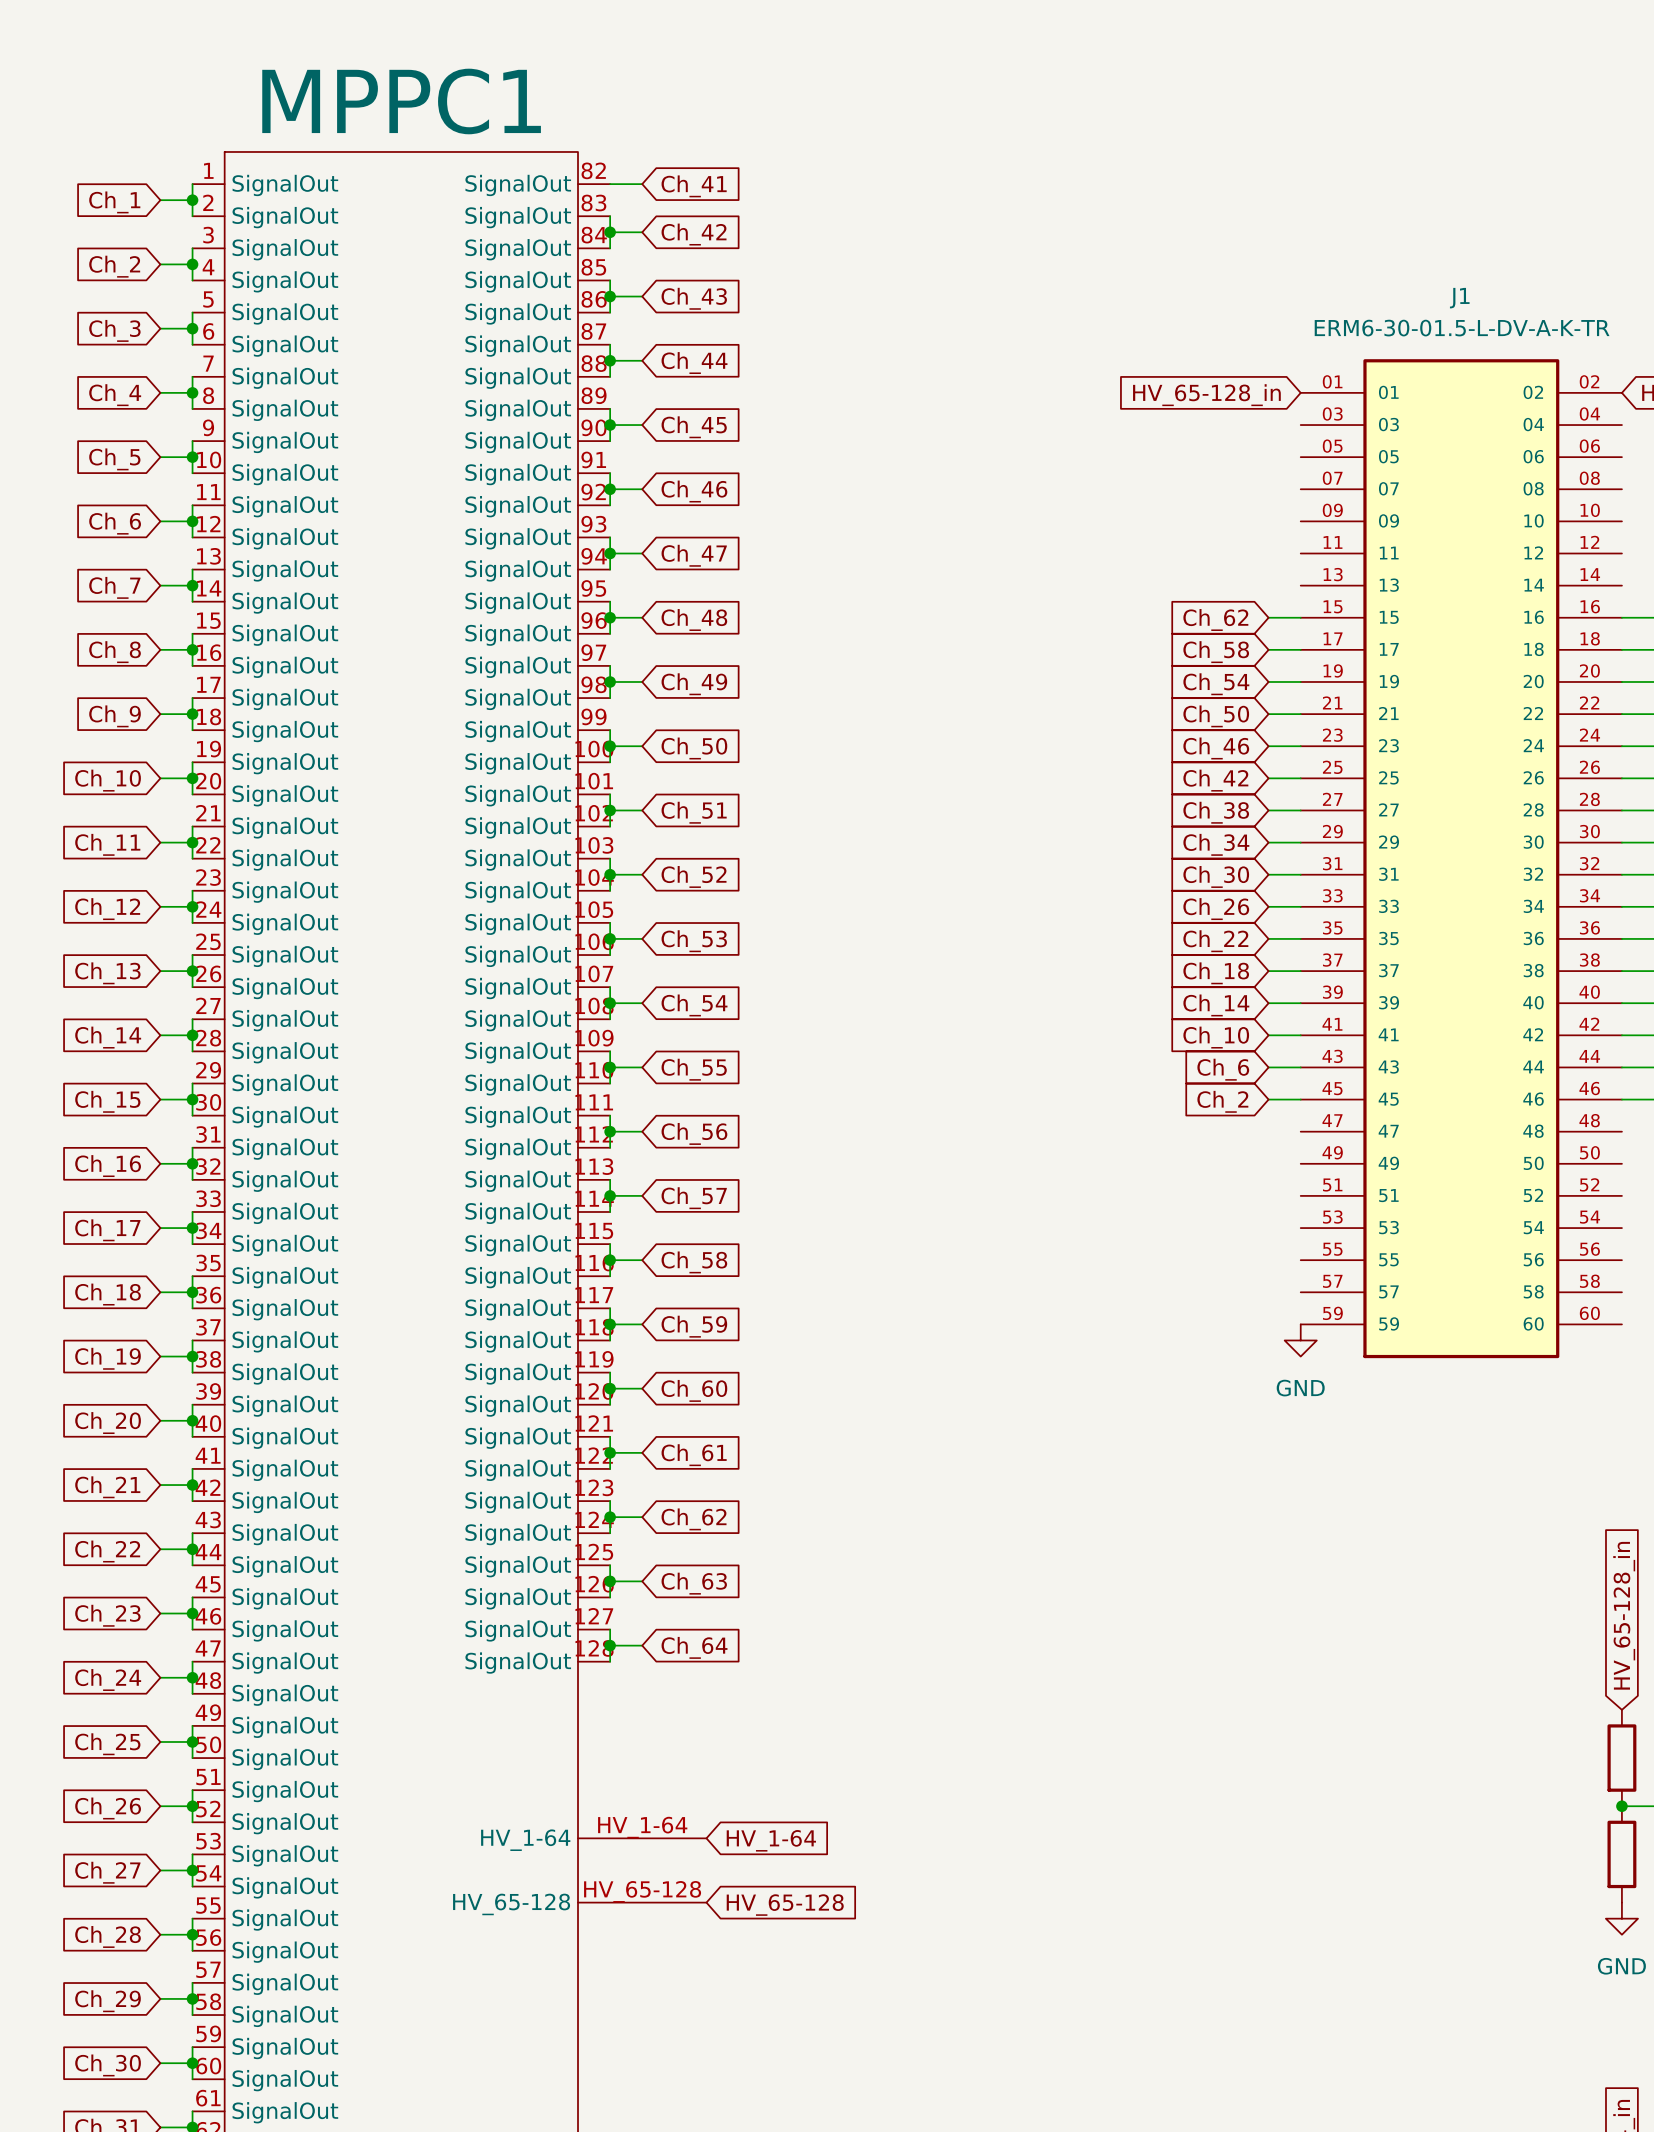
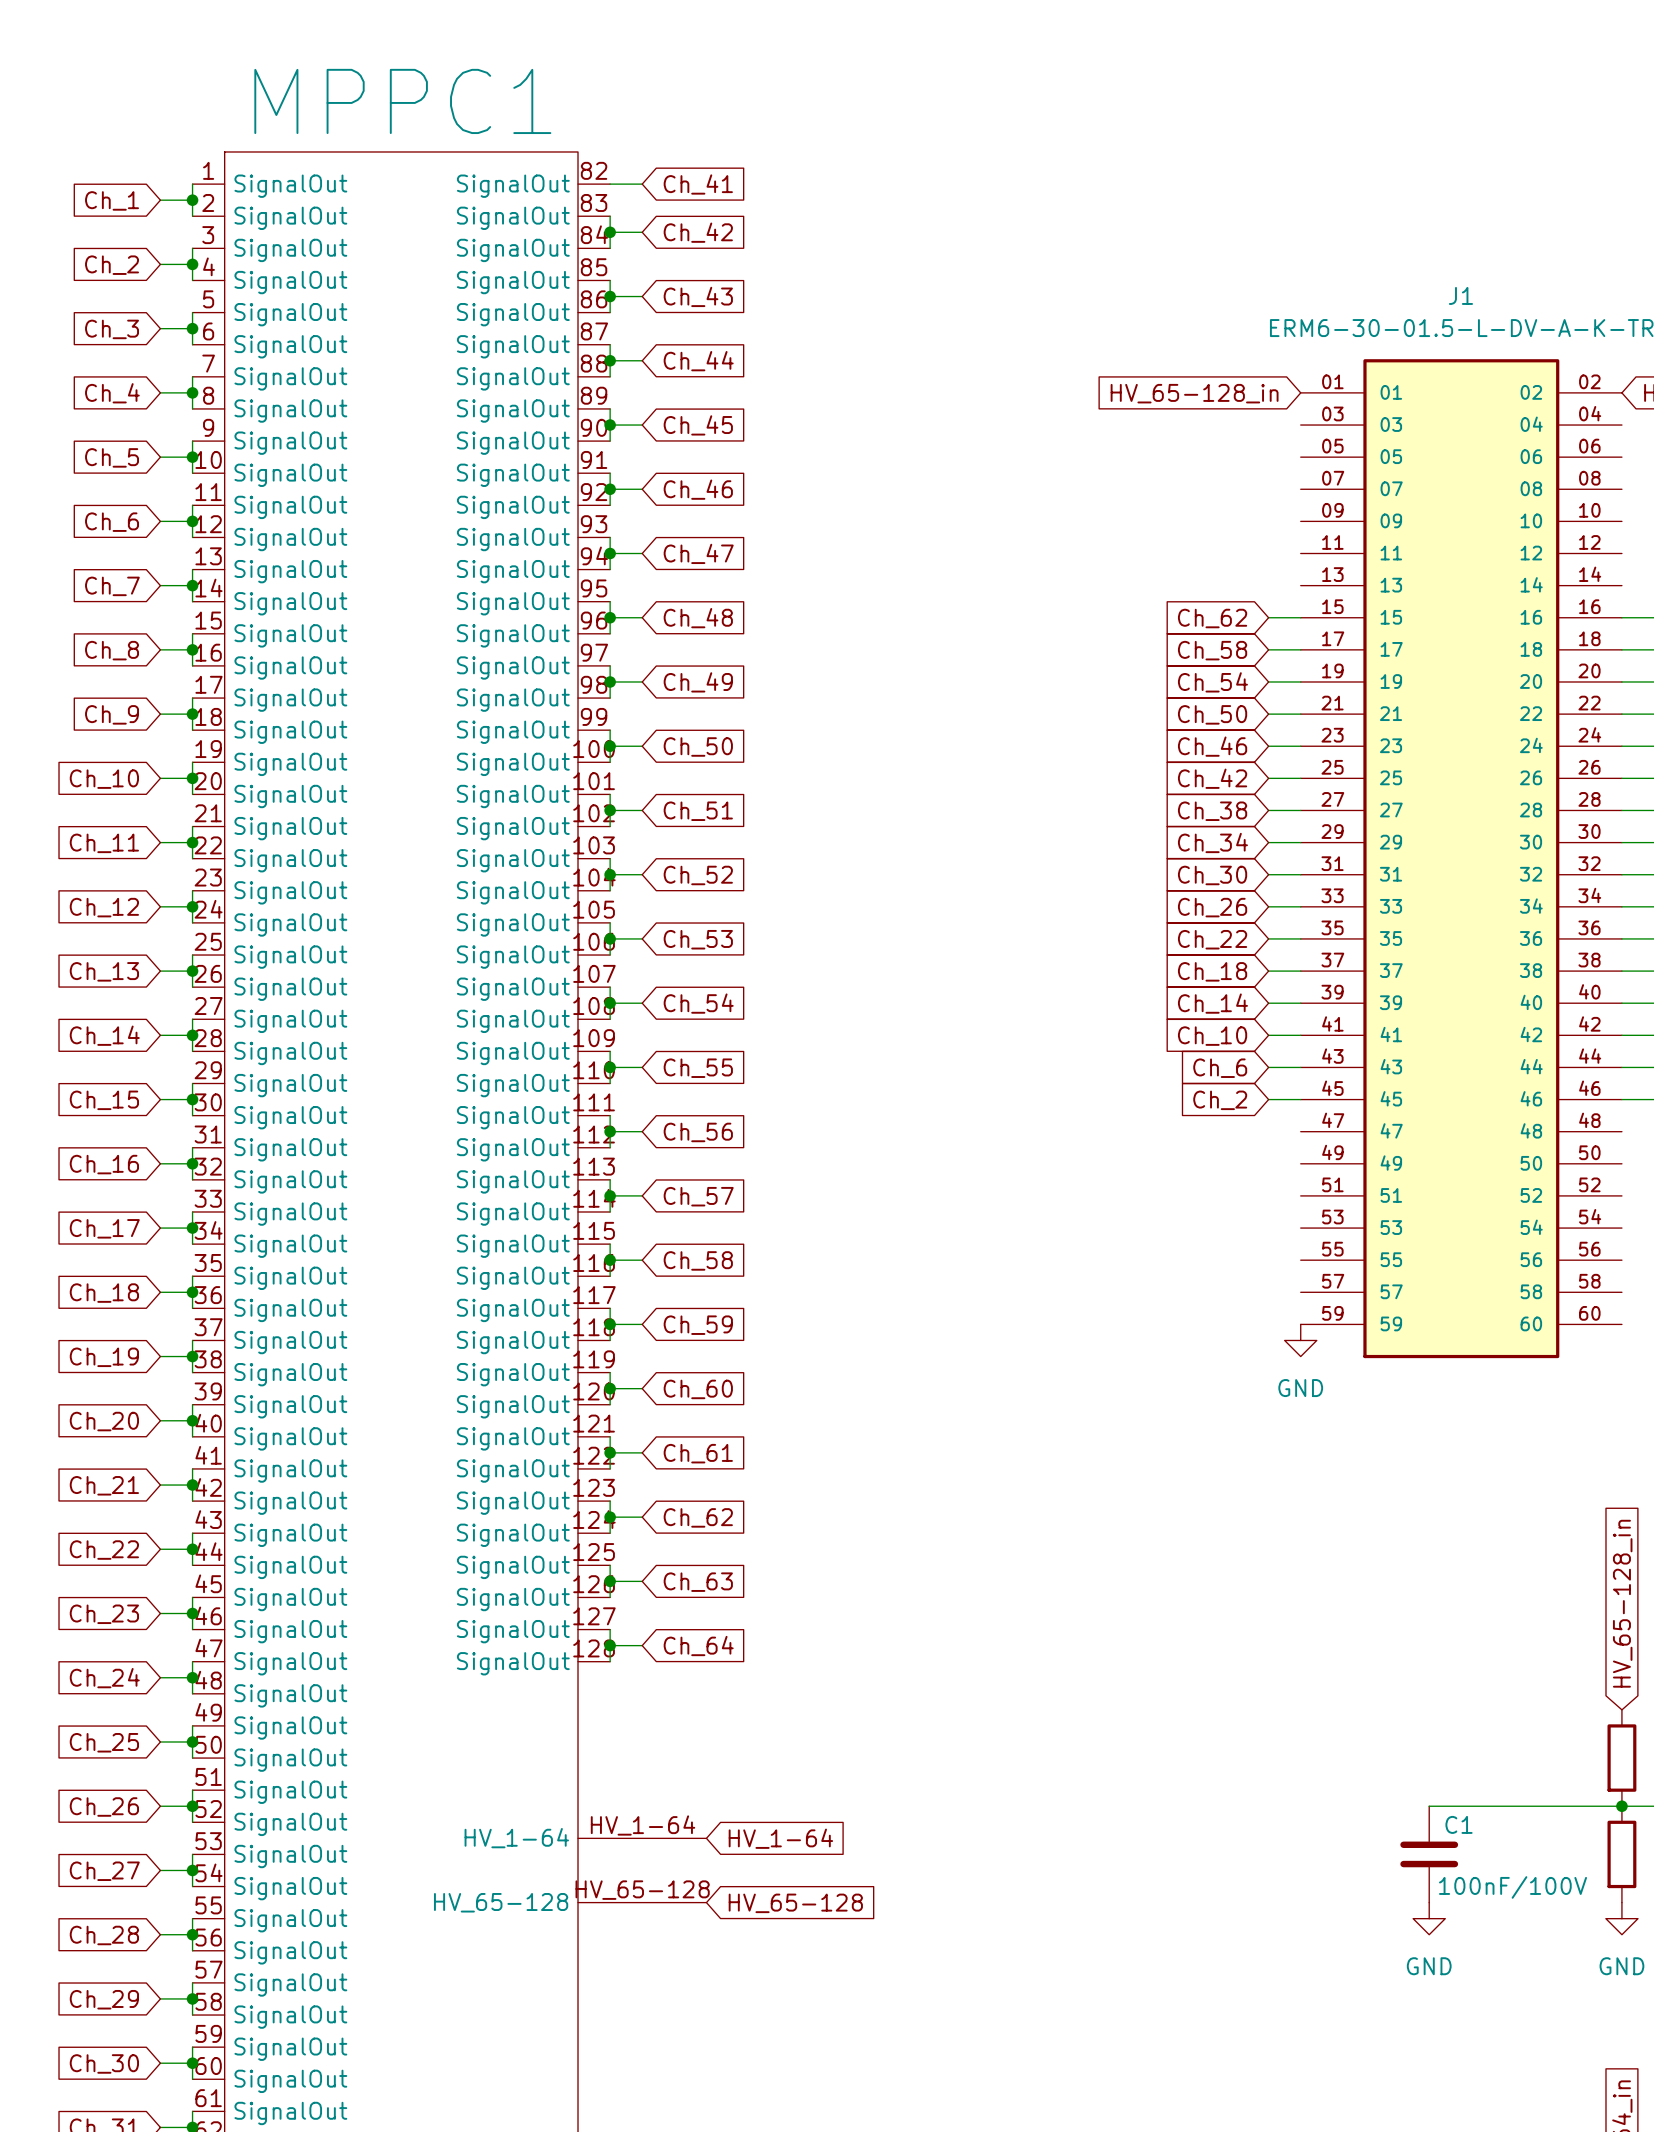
wire: none -> (1429, 1806) (1621, 1806)
C1: none -> 100nF/100V (1429, 1854)
power symbol: none -> GND (1429, 1918)

